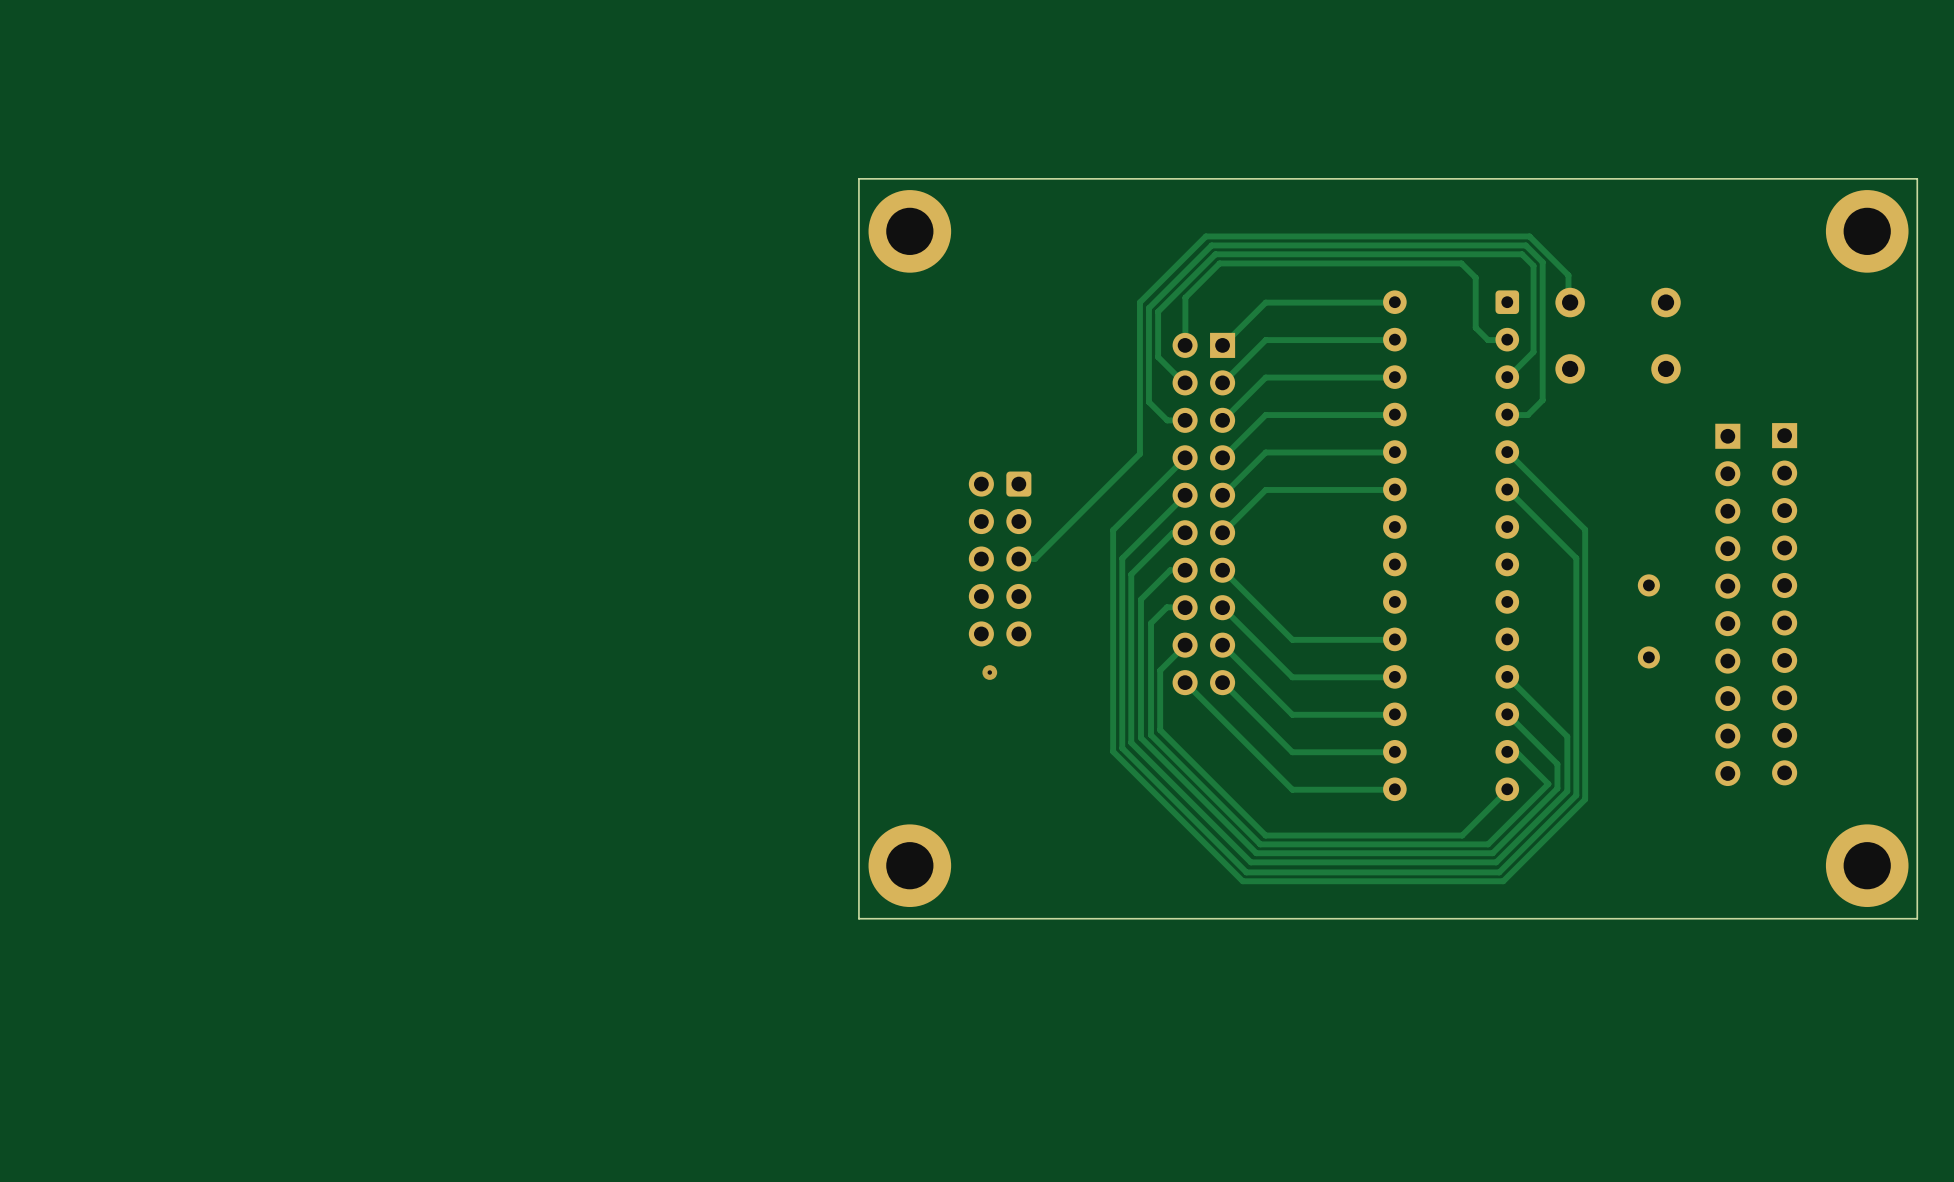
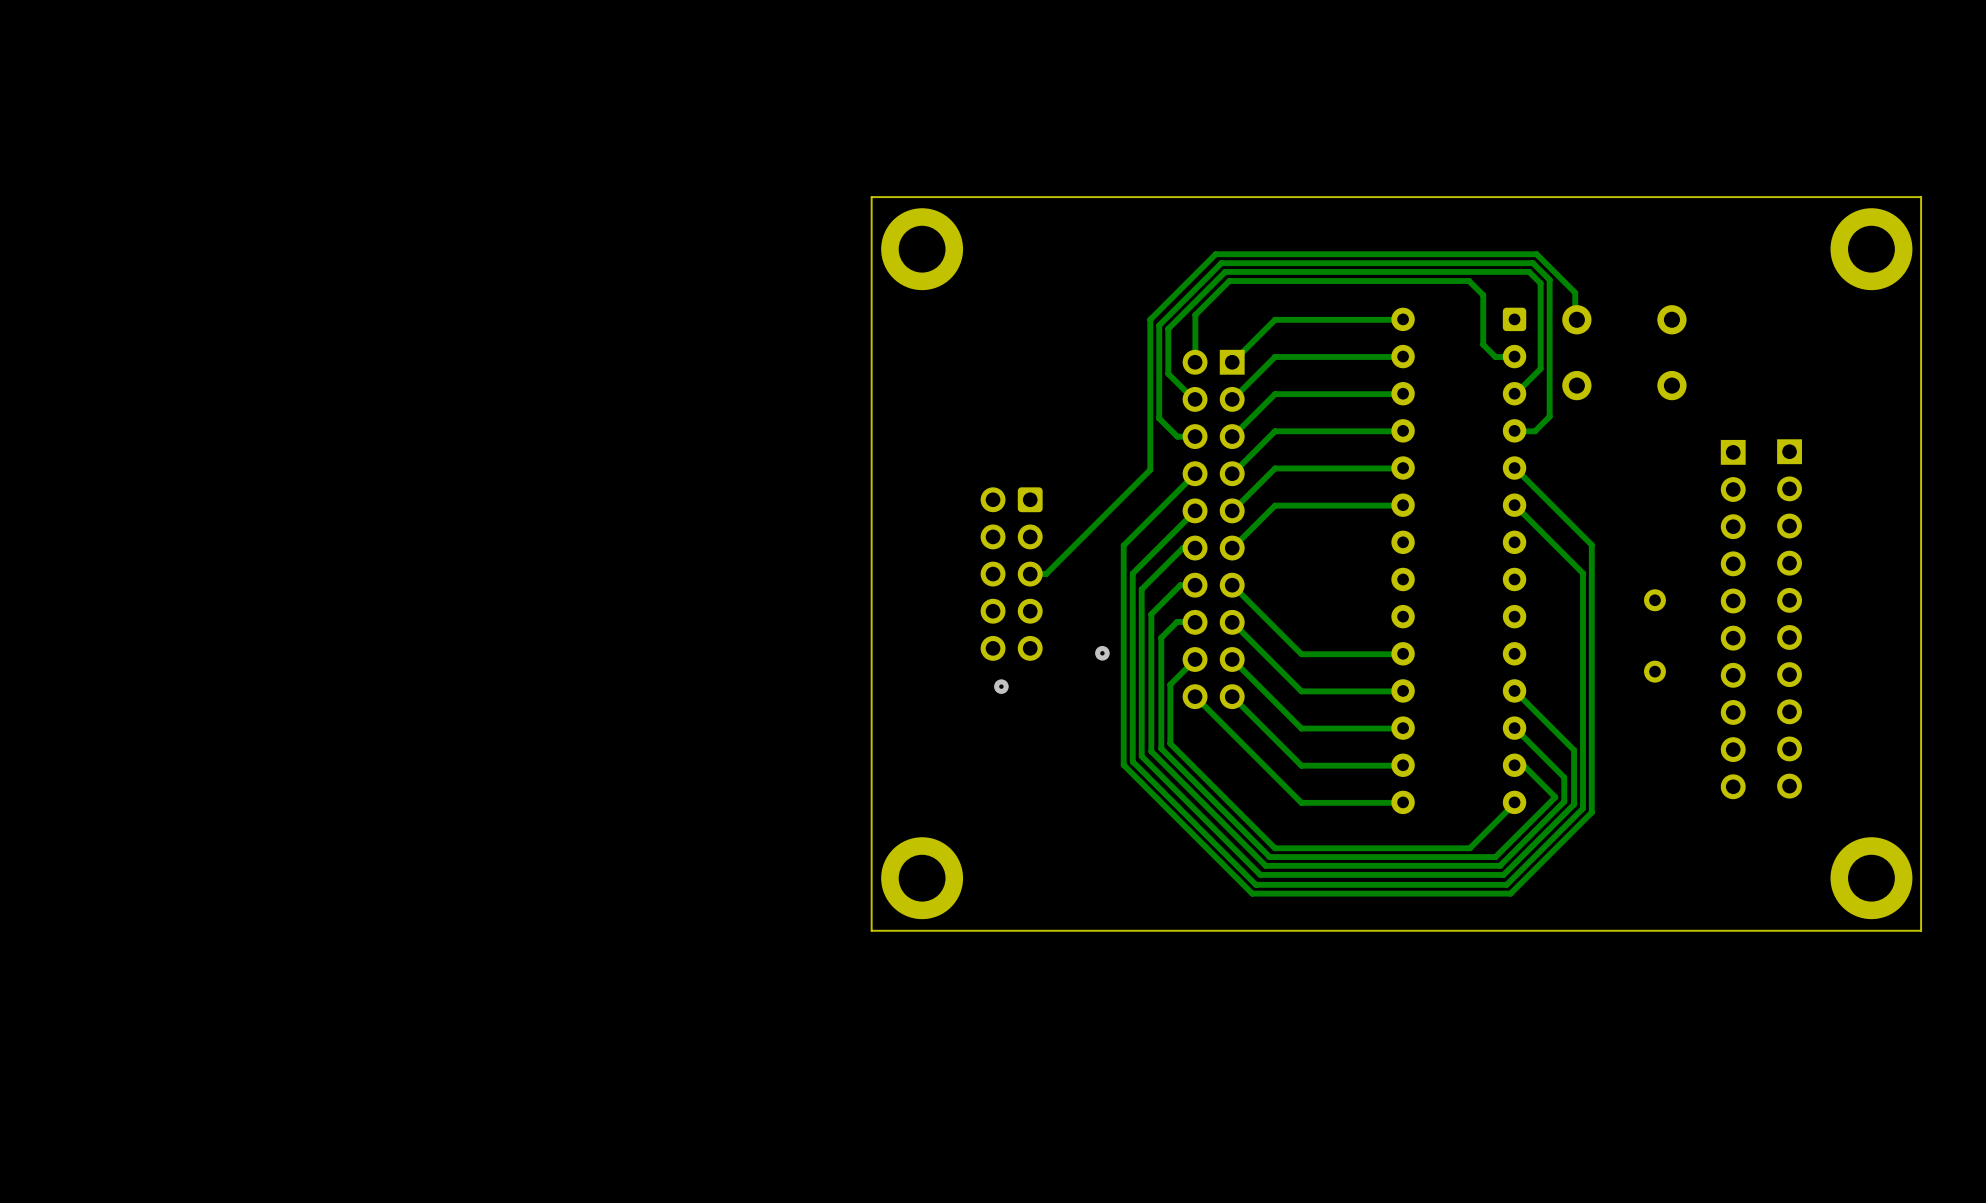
via: none -> (1102, 653)

